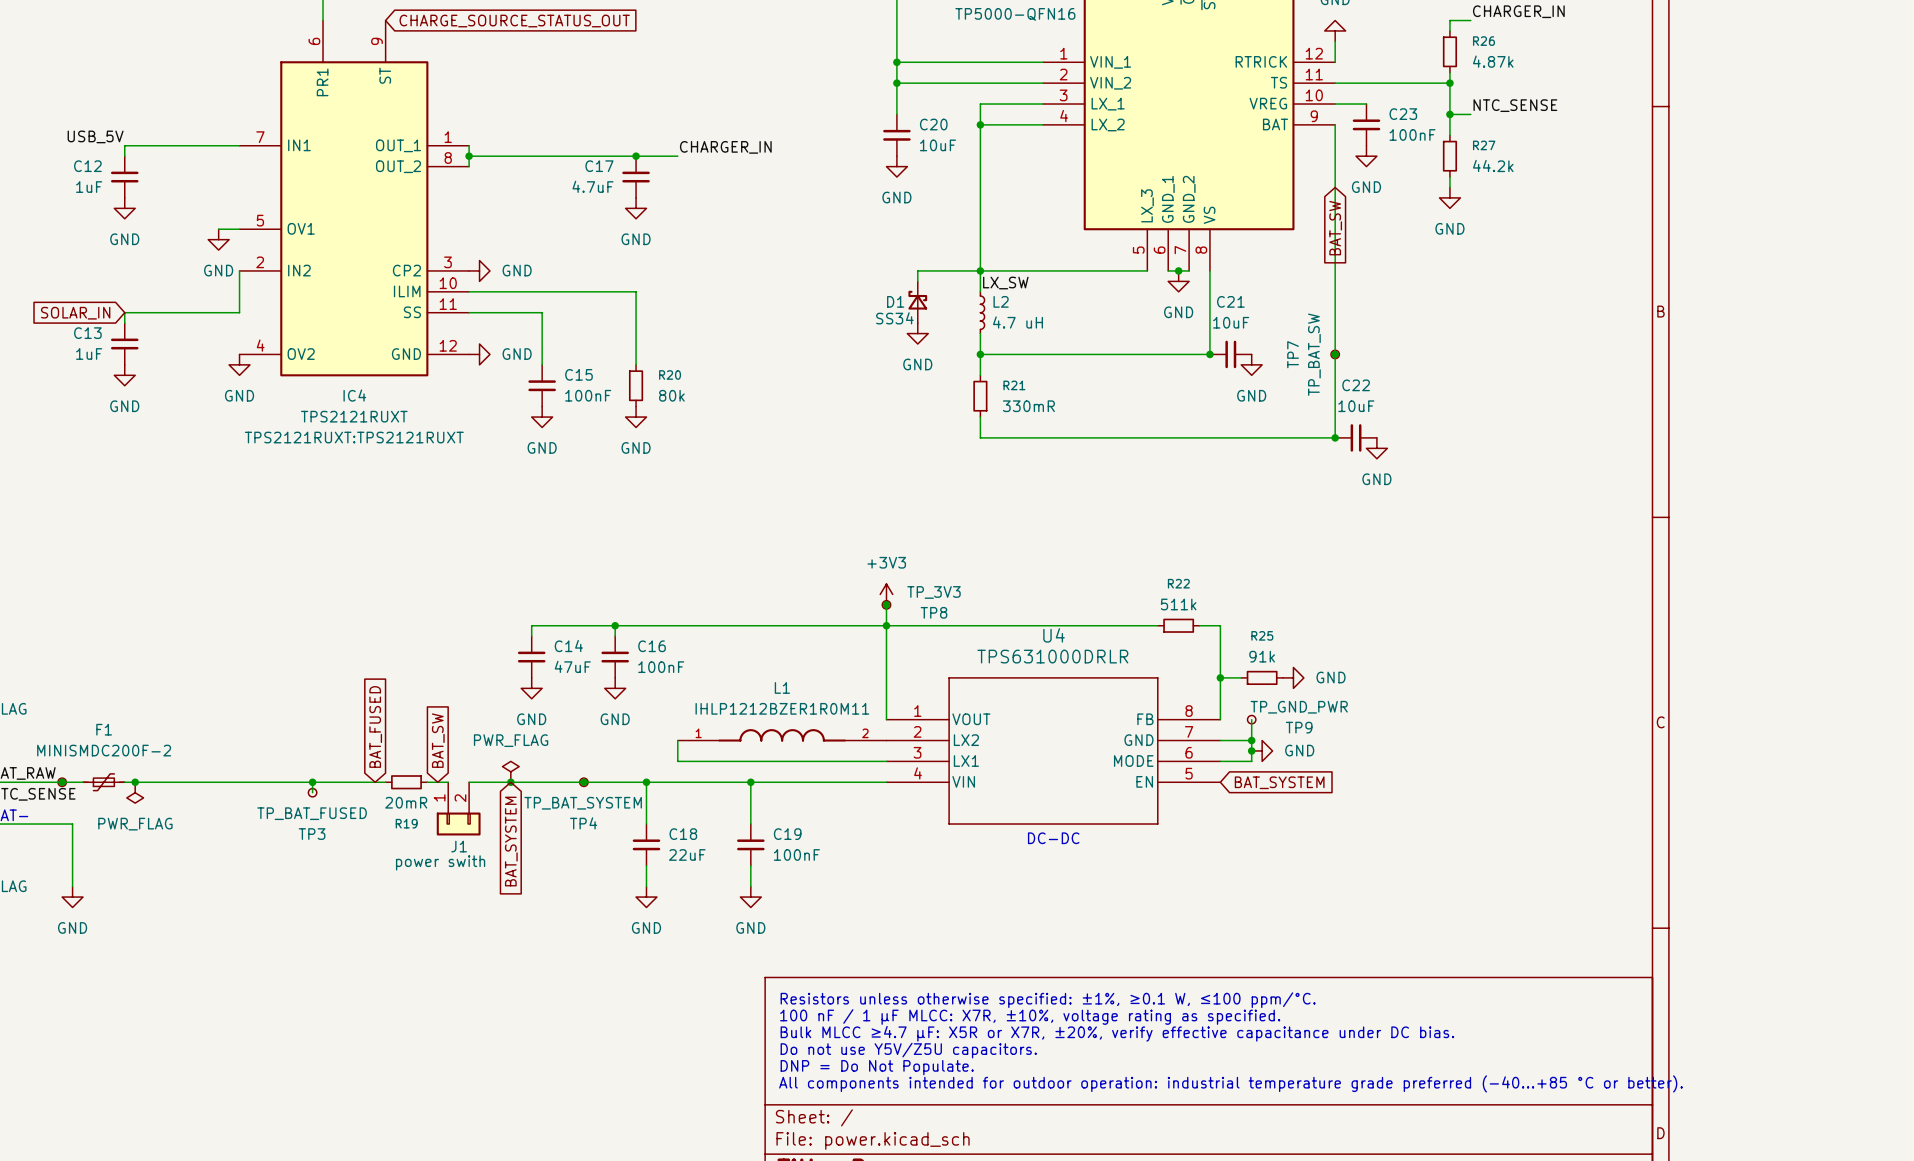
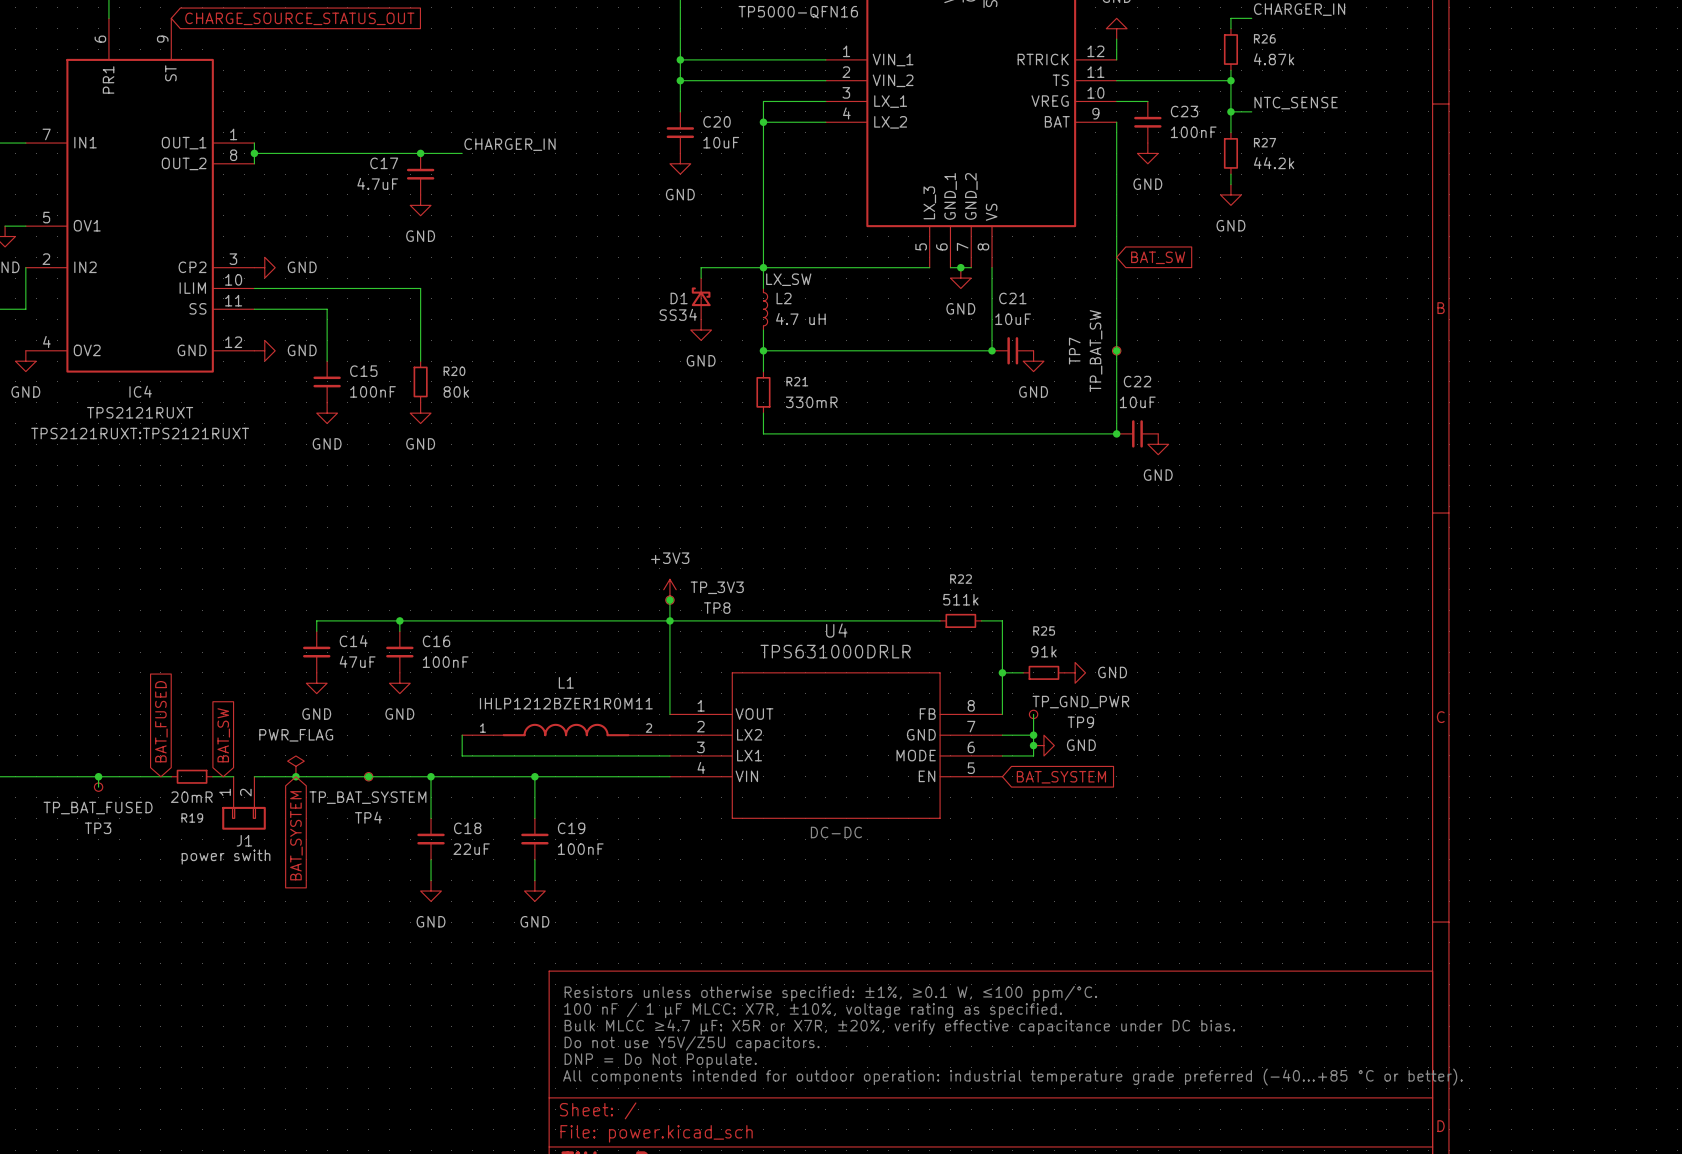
global label rotation: 0° (1335, 228) -> 90° counterclockwise (1158, 257)

